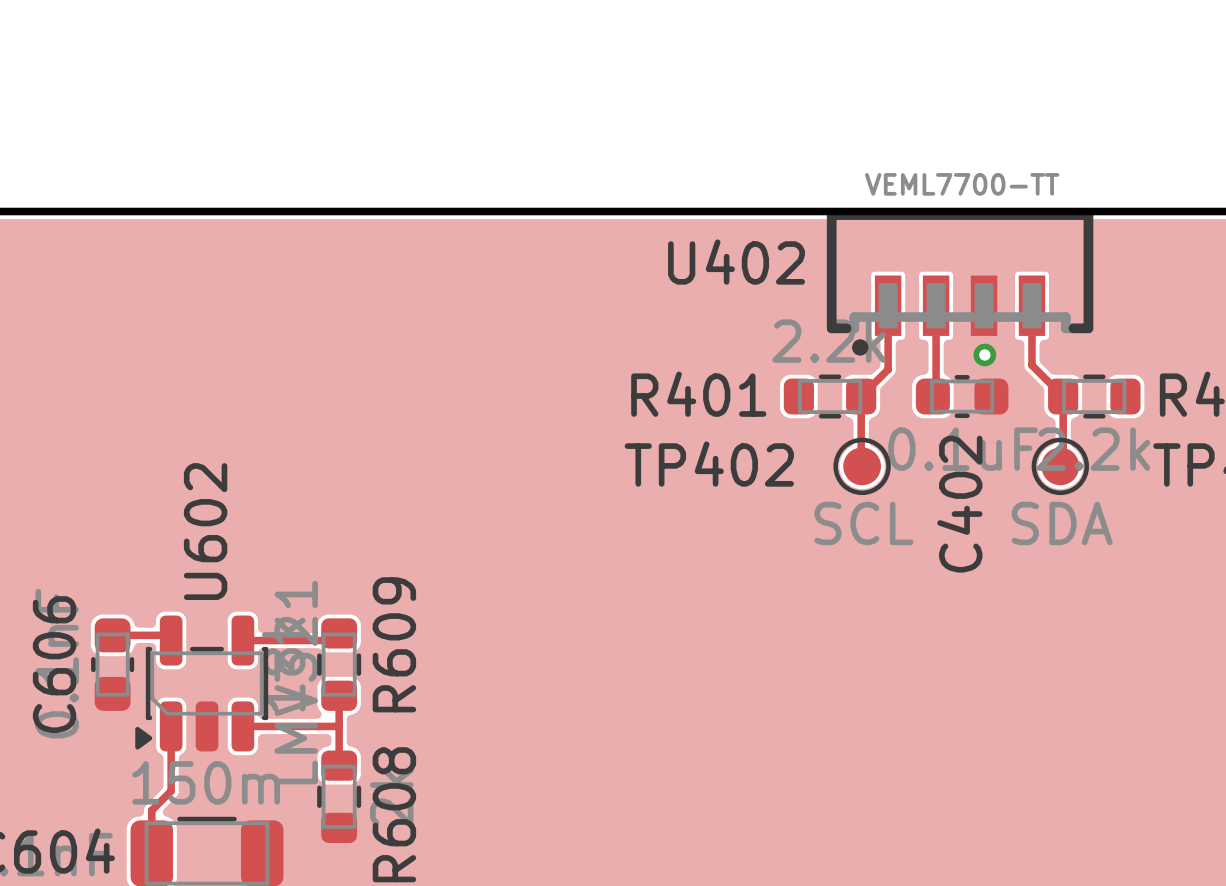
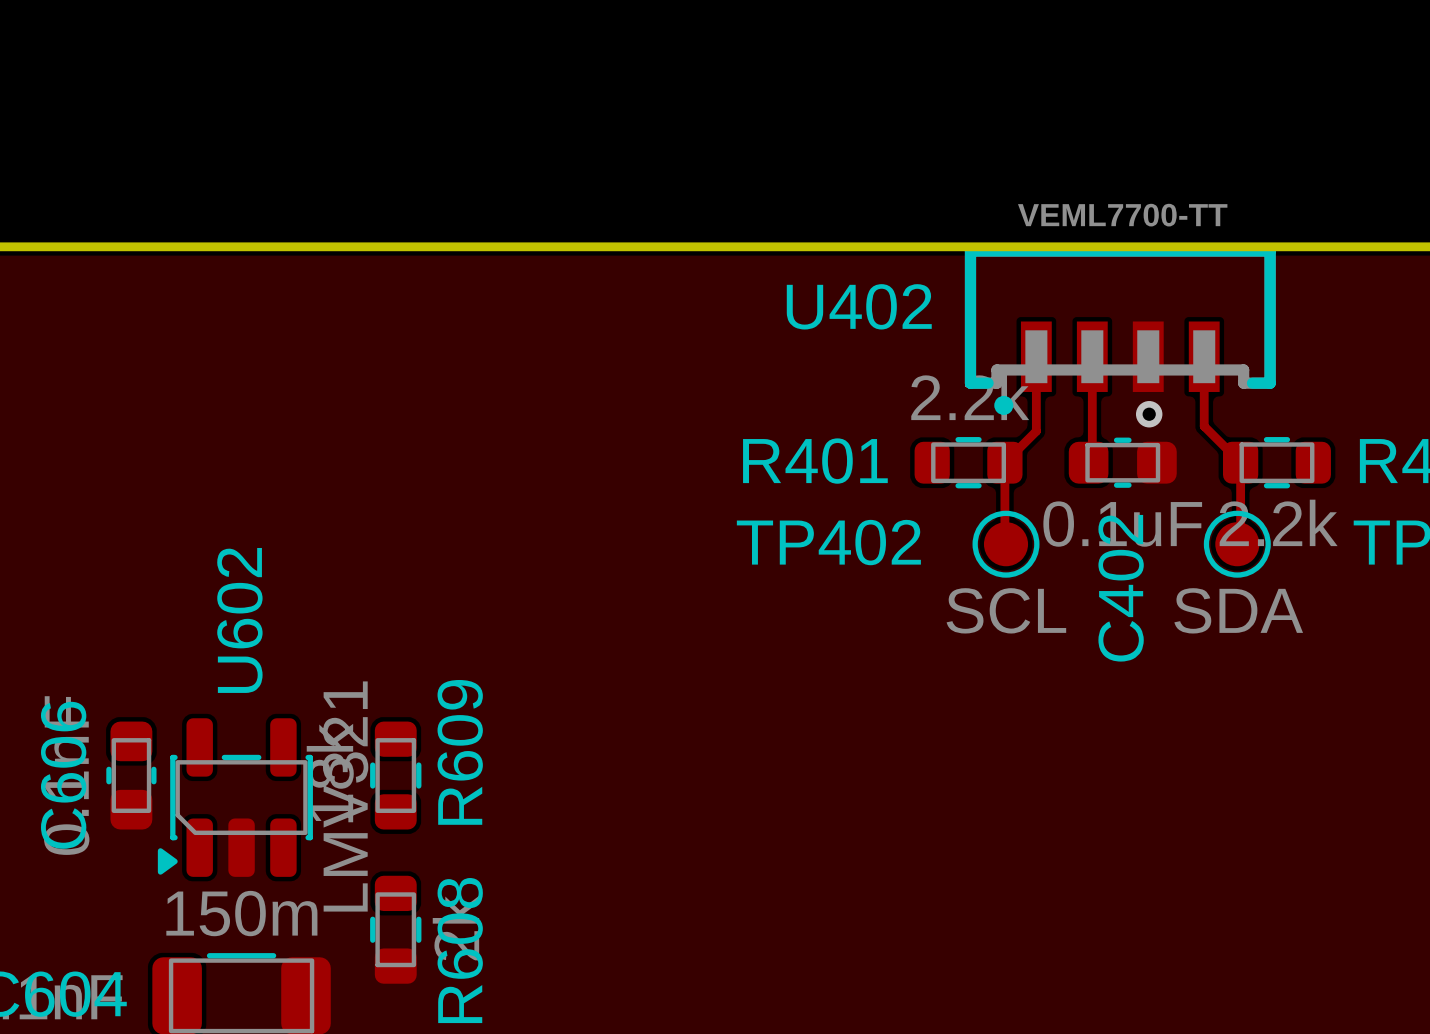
track: (339, 633) (332, 640) (242, 640) -> none
track: (112, 635) (165, 635) (171, 640) -> none
track: (339, 695) (339, 765) -> none
track: (339, 725) (242, 726) -> none
track: (171, 726) (171, 791) (151, 810) (151, 853) -> none

